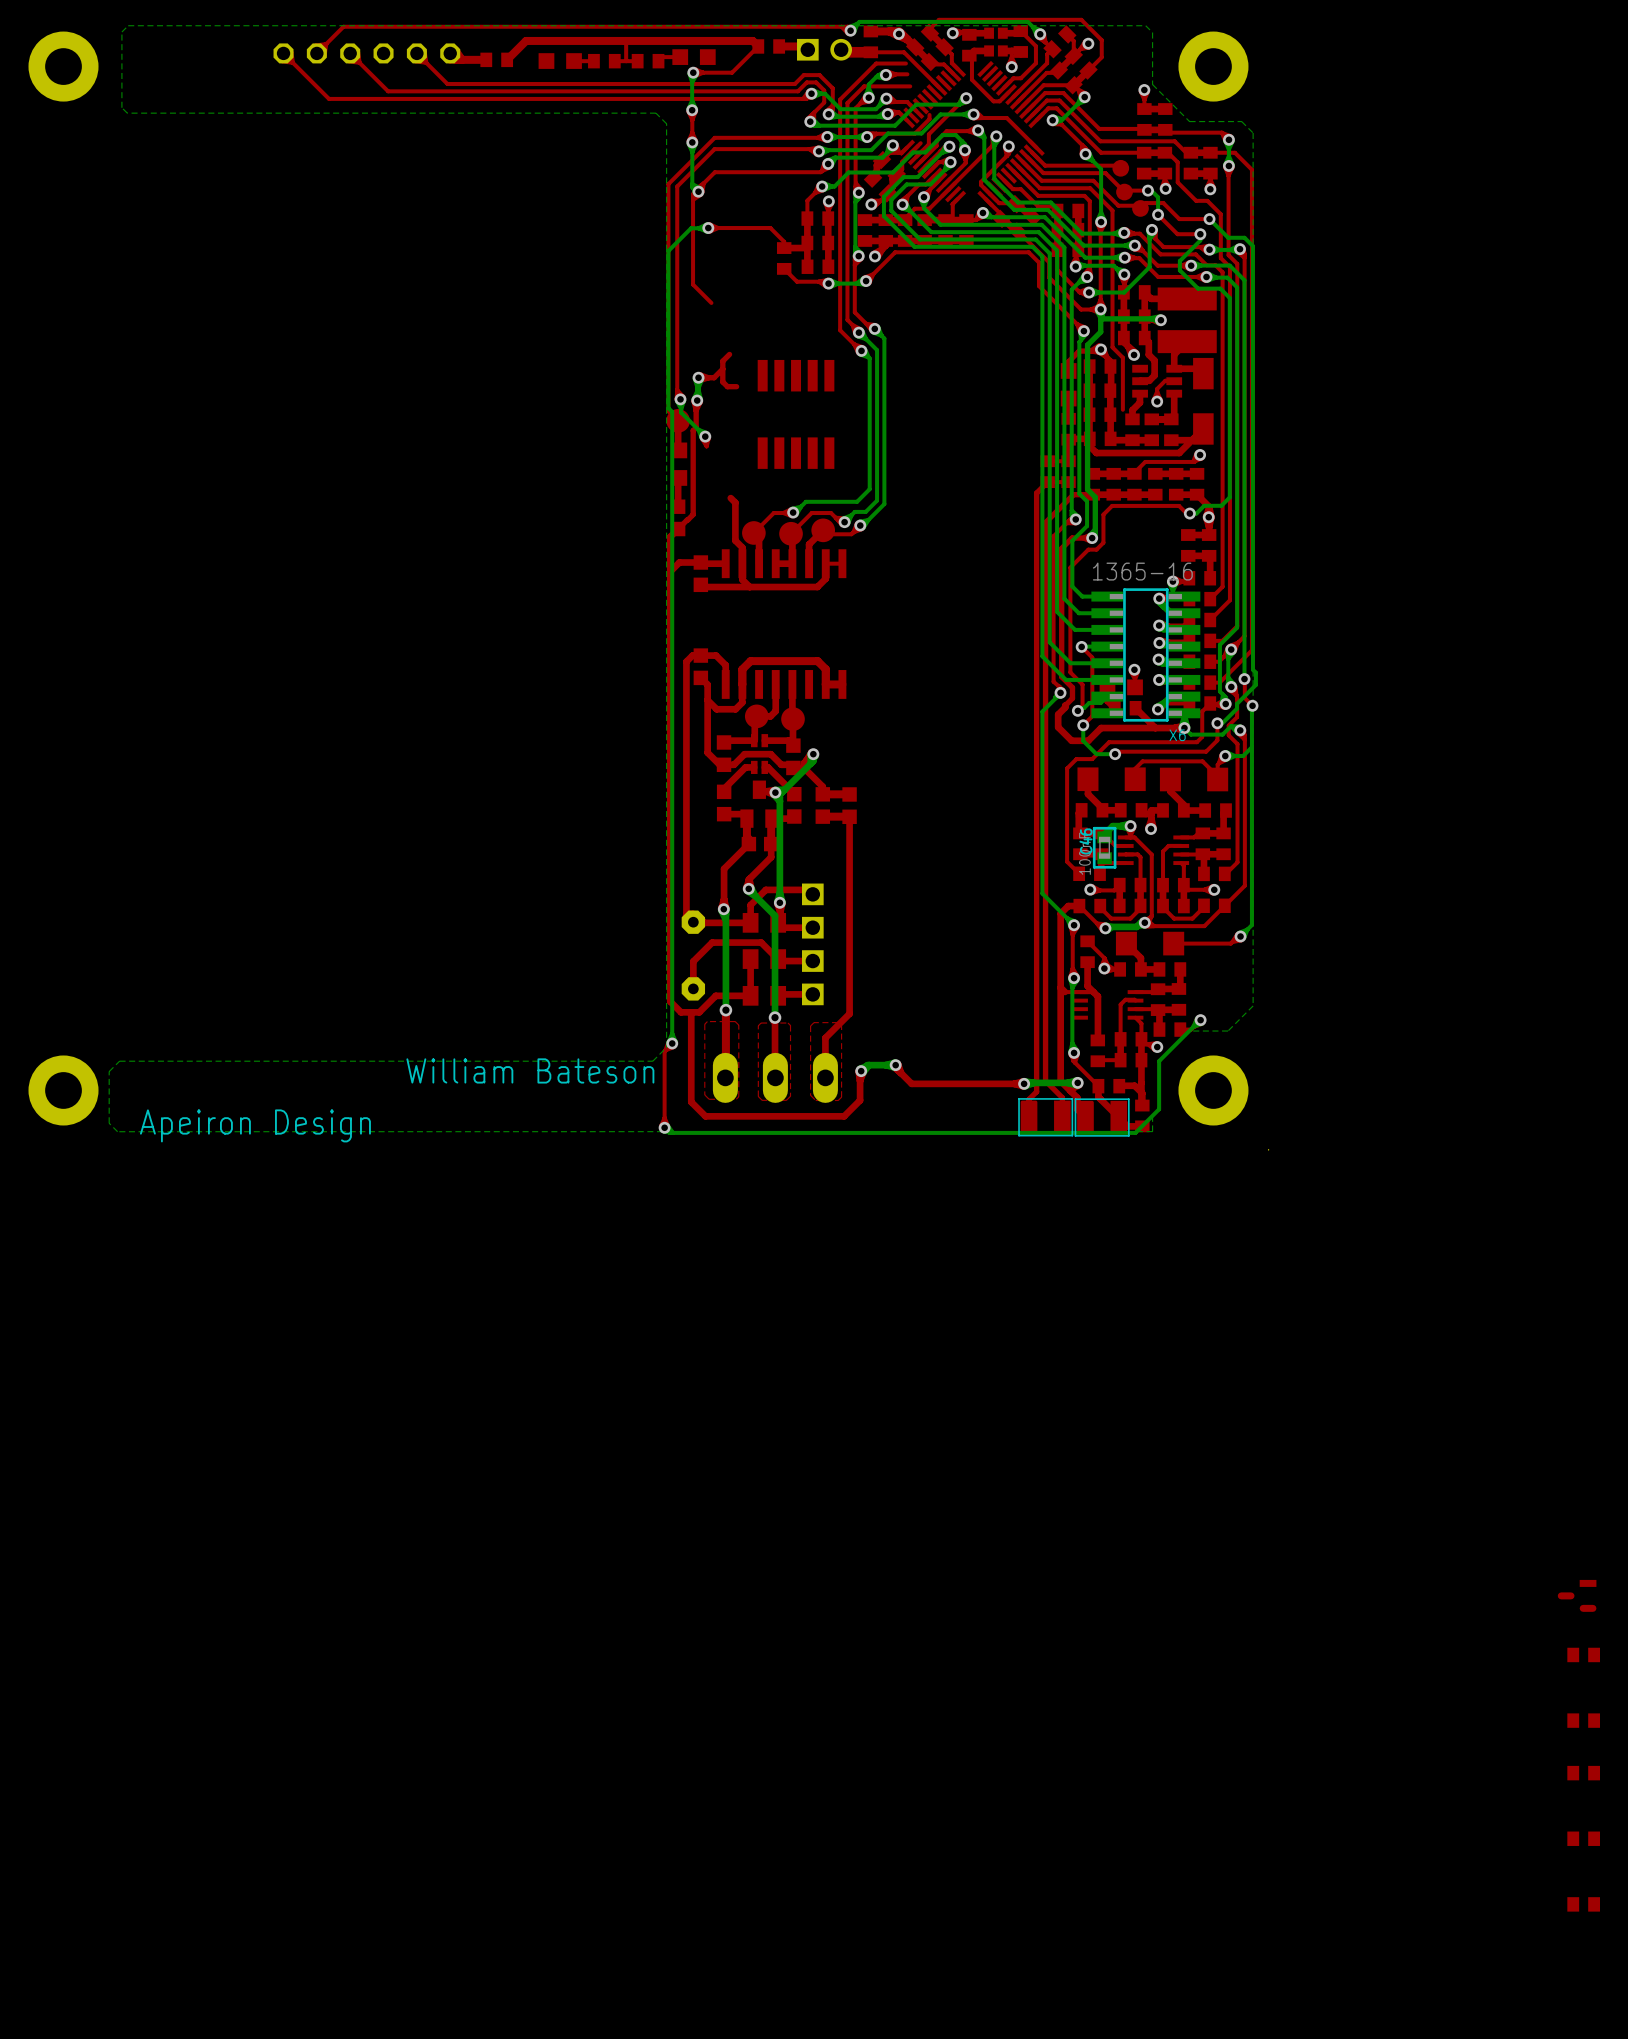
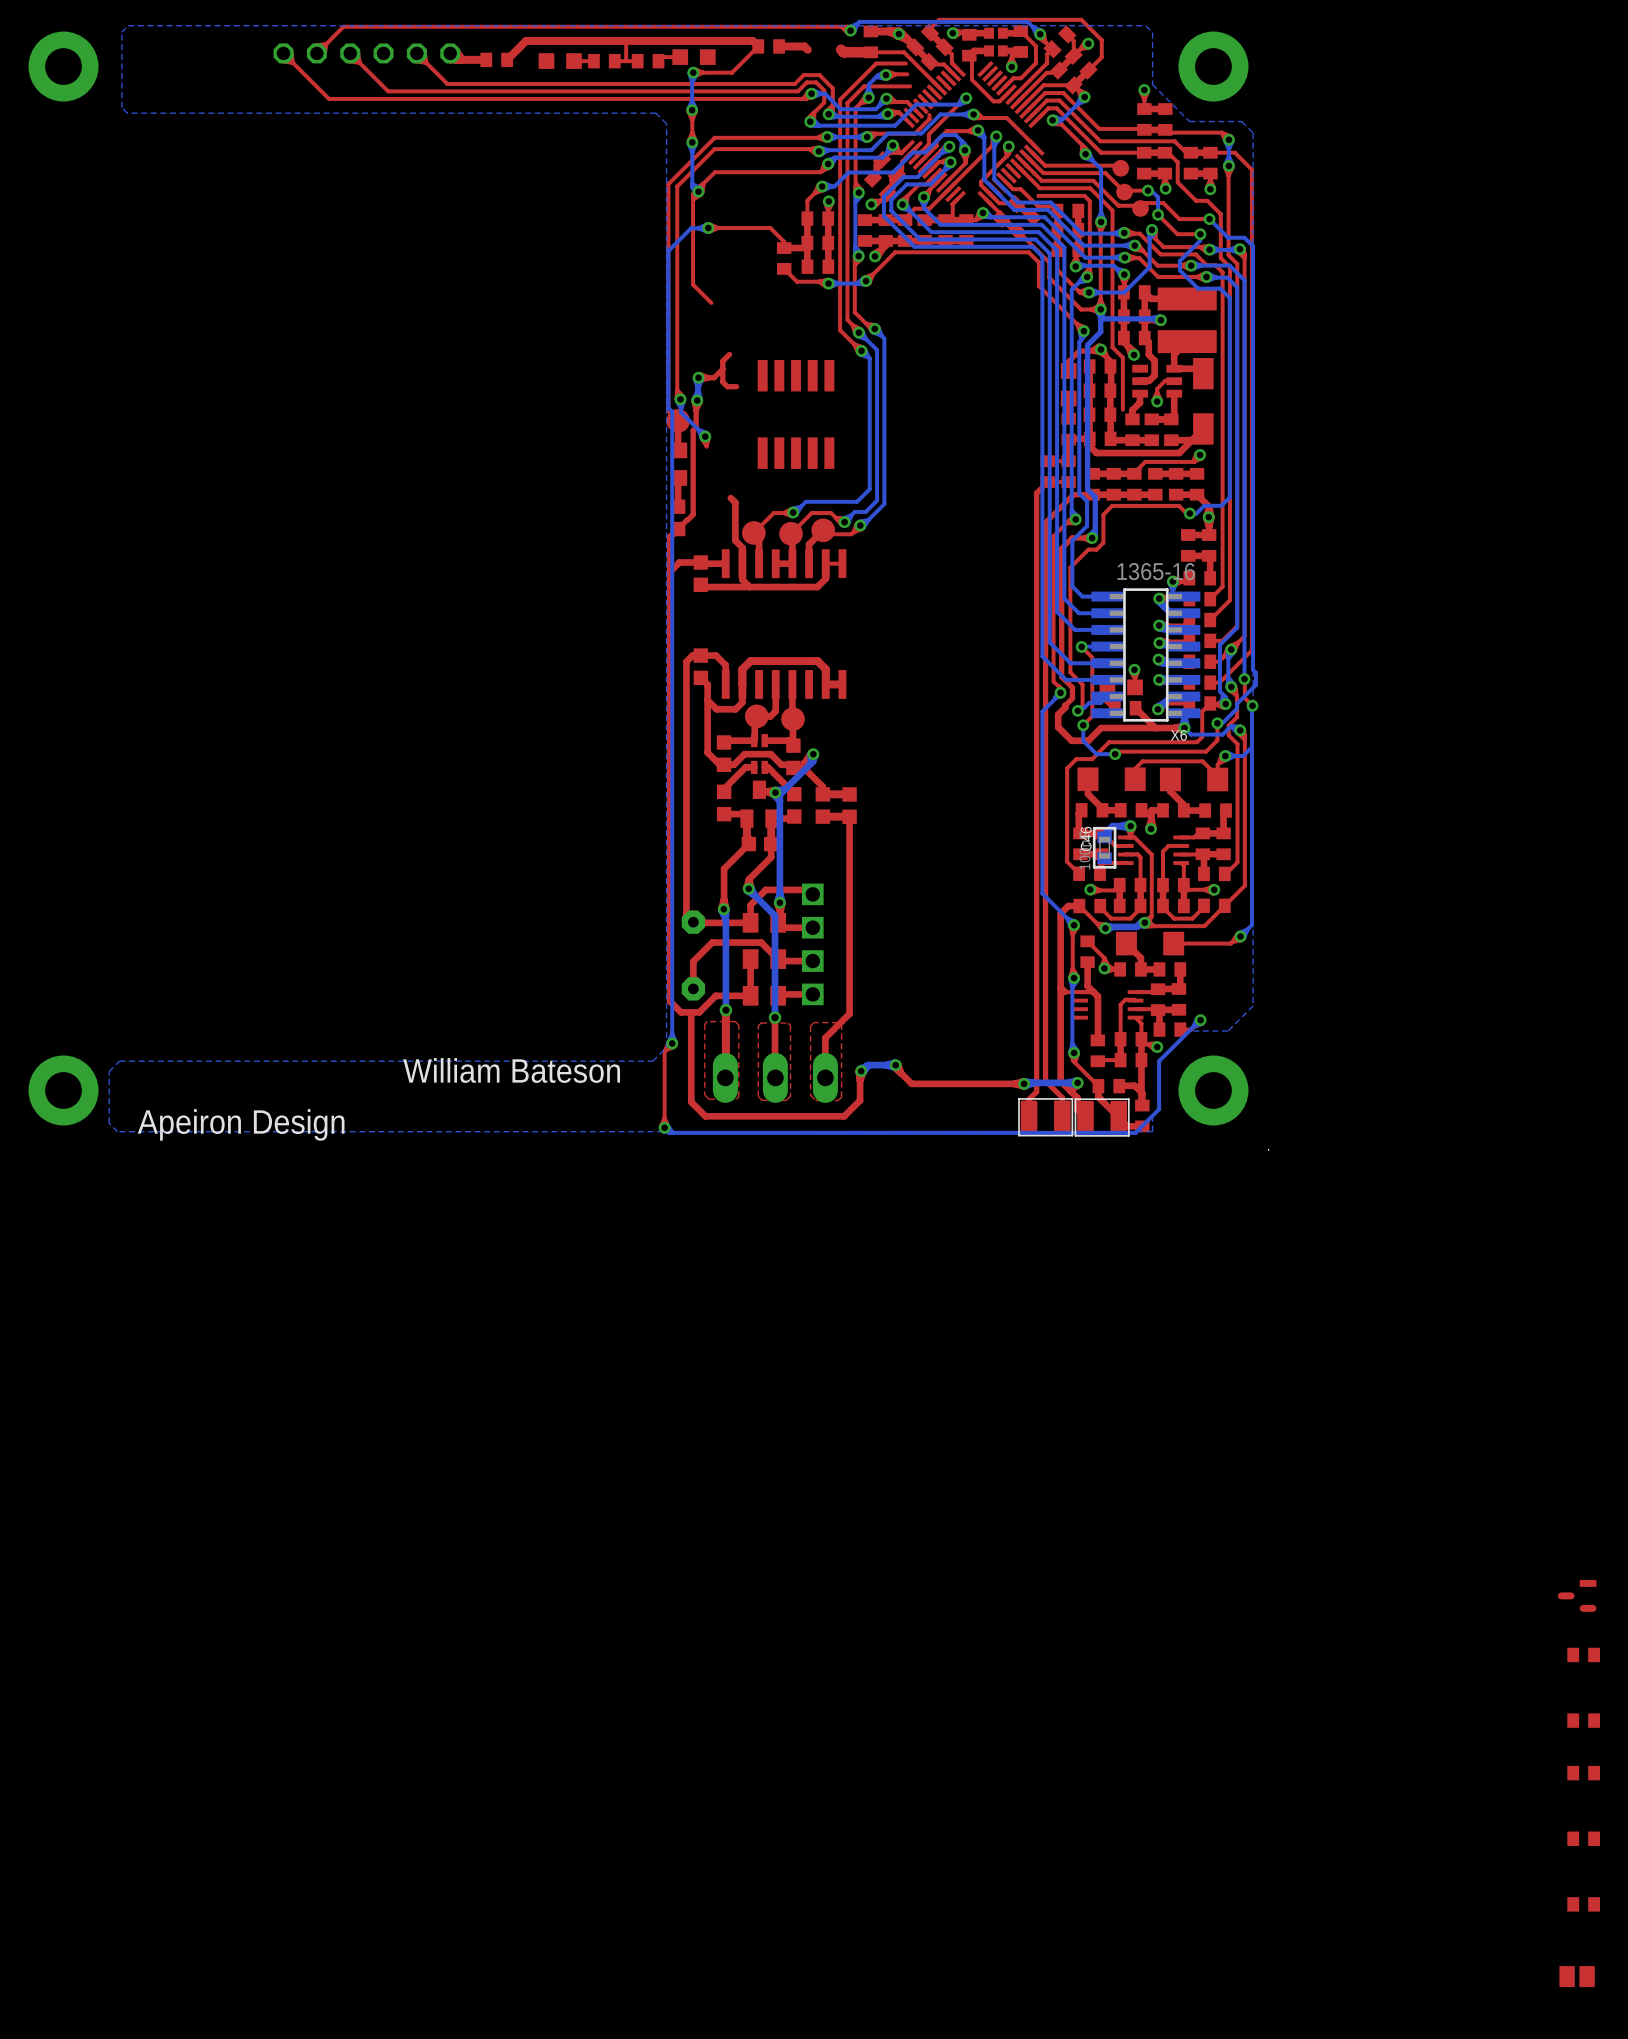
part: (824, 49) -> none
top track: (1013, 170) (1038, 195) -> none
part: none -> (1577, 1976)

